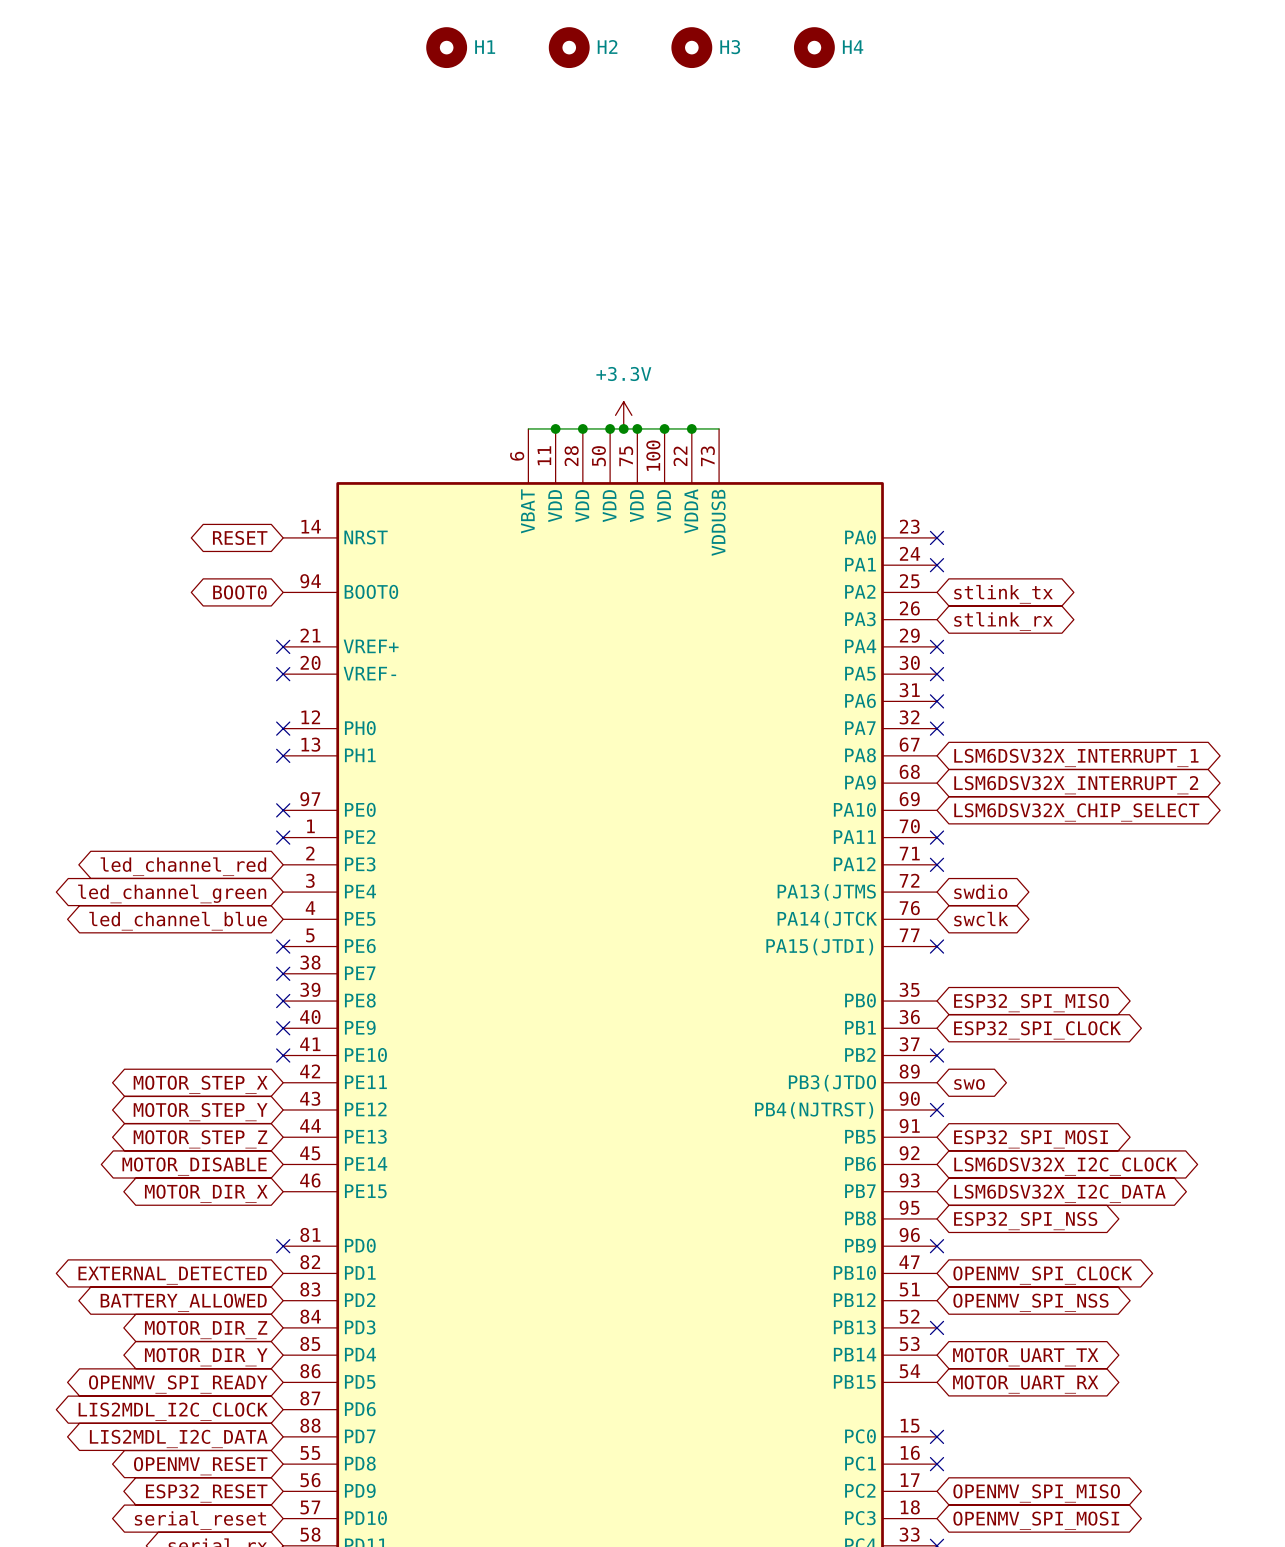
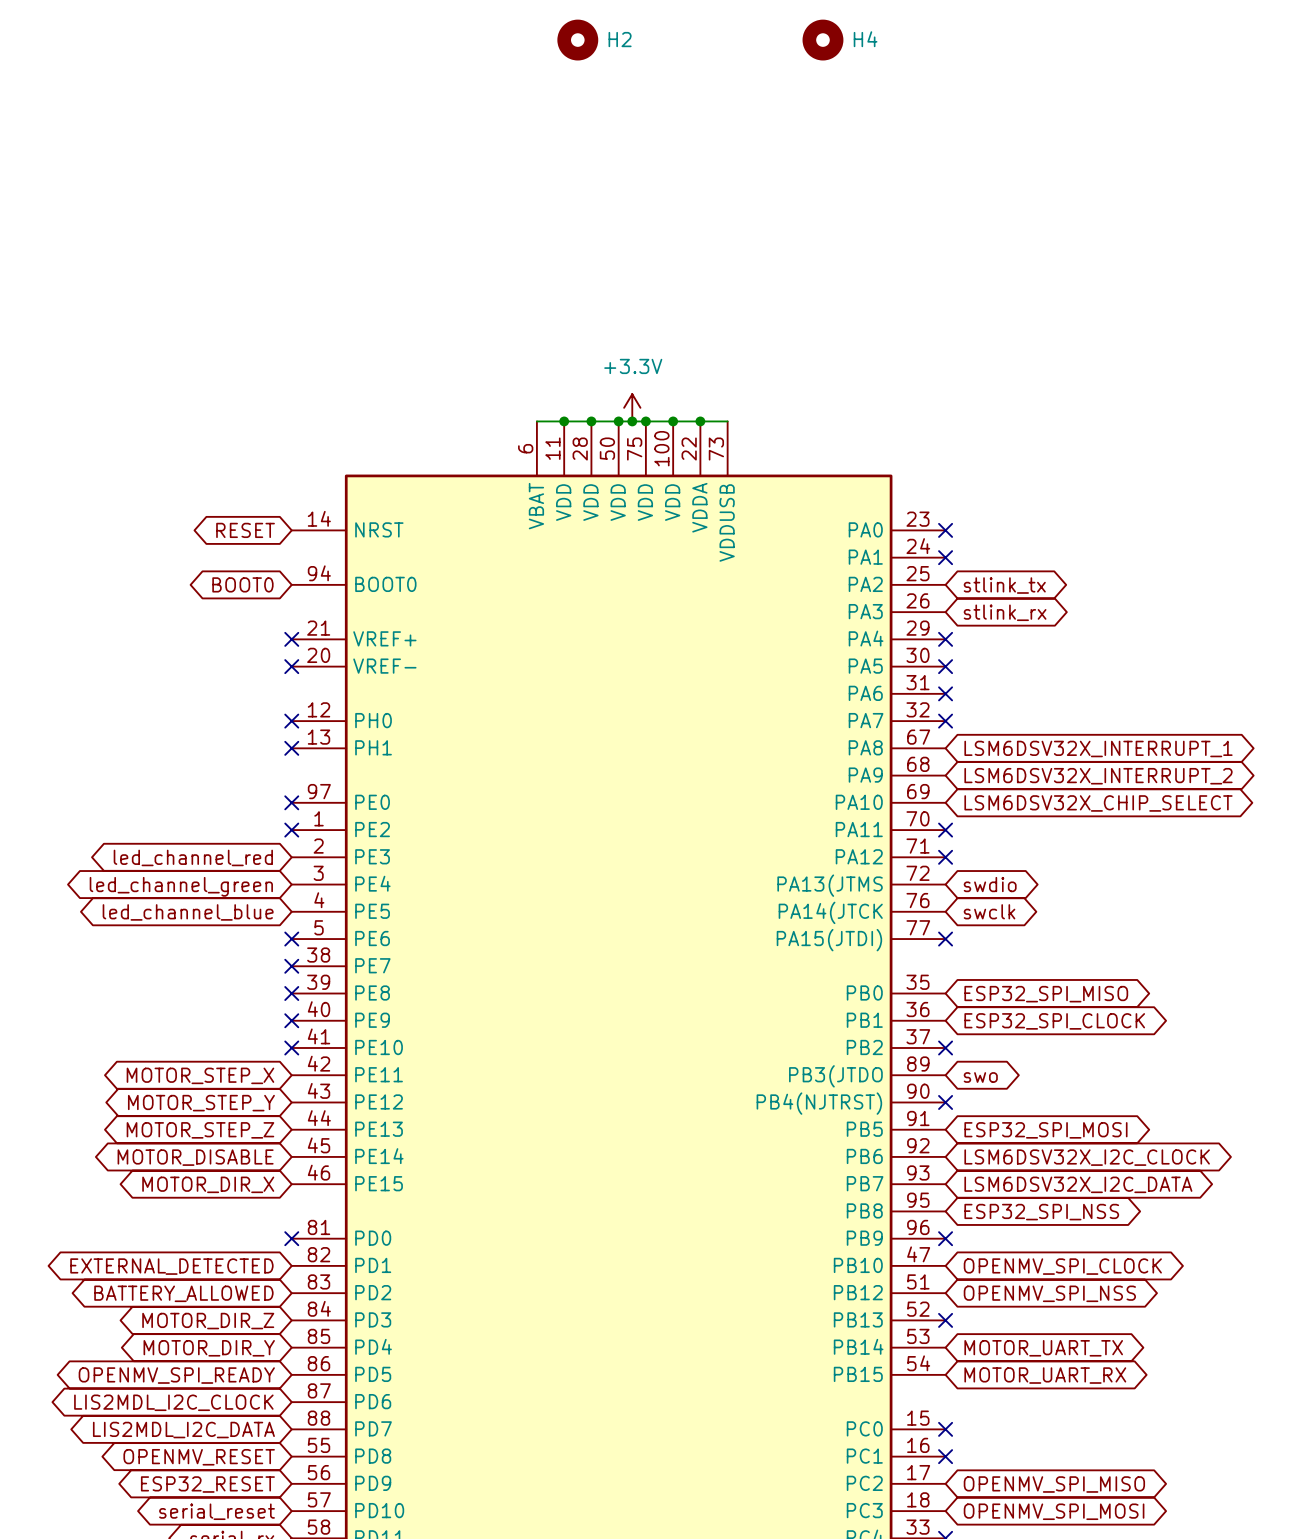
H1: (446, 47) -> none
H3: (691, 47) -> none

